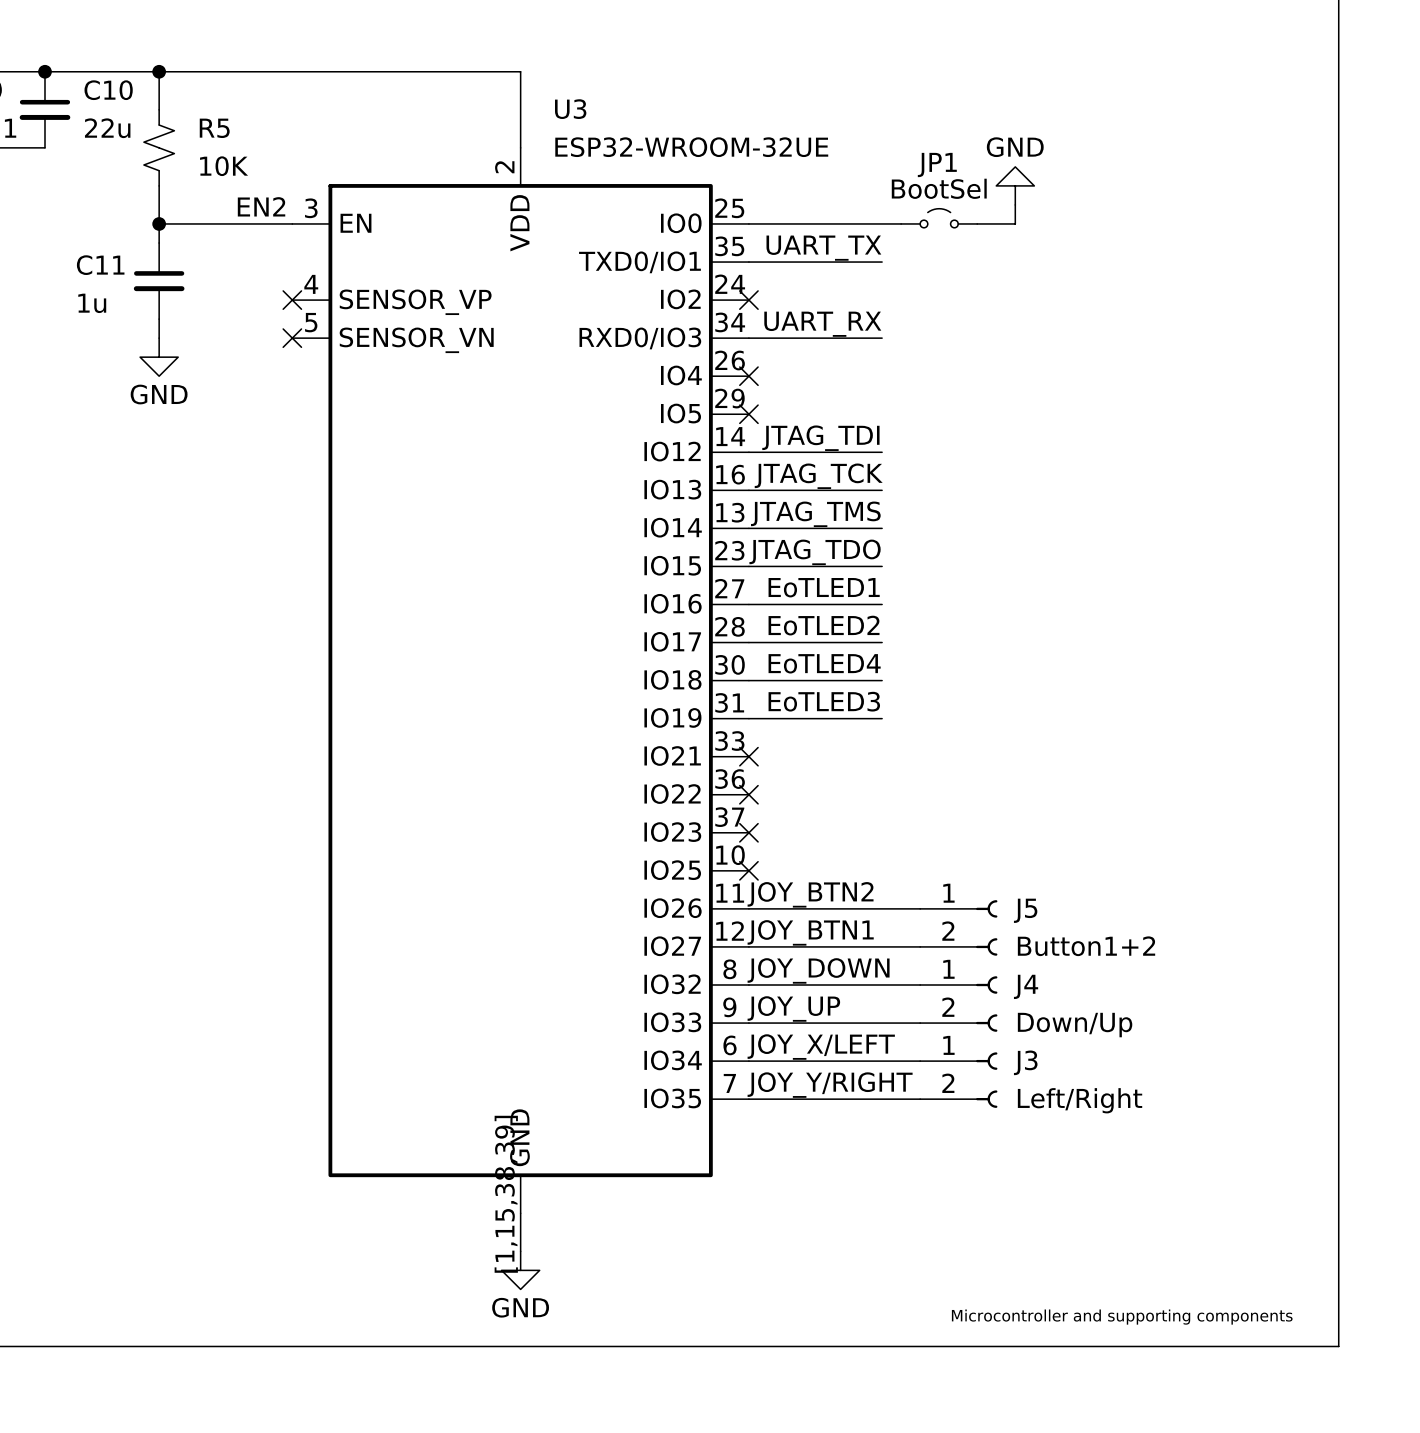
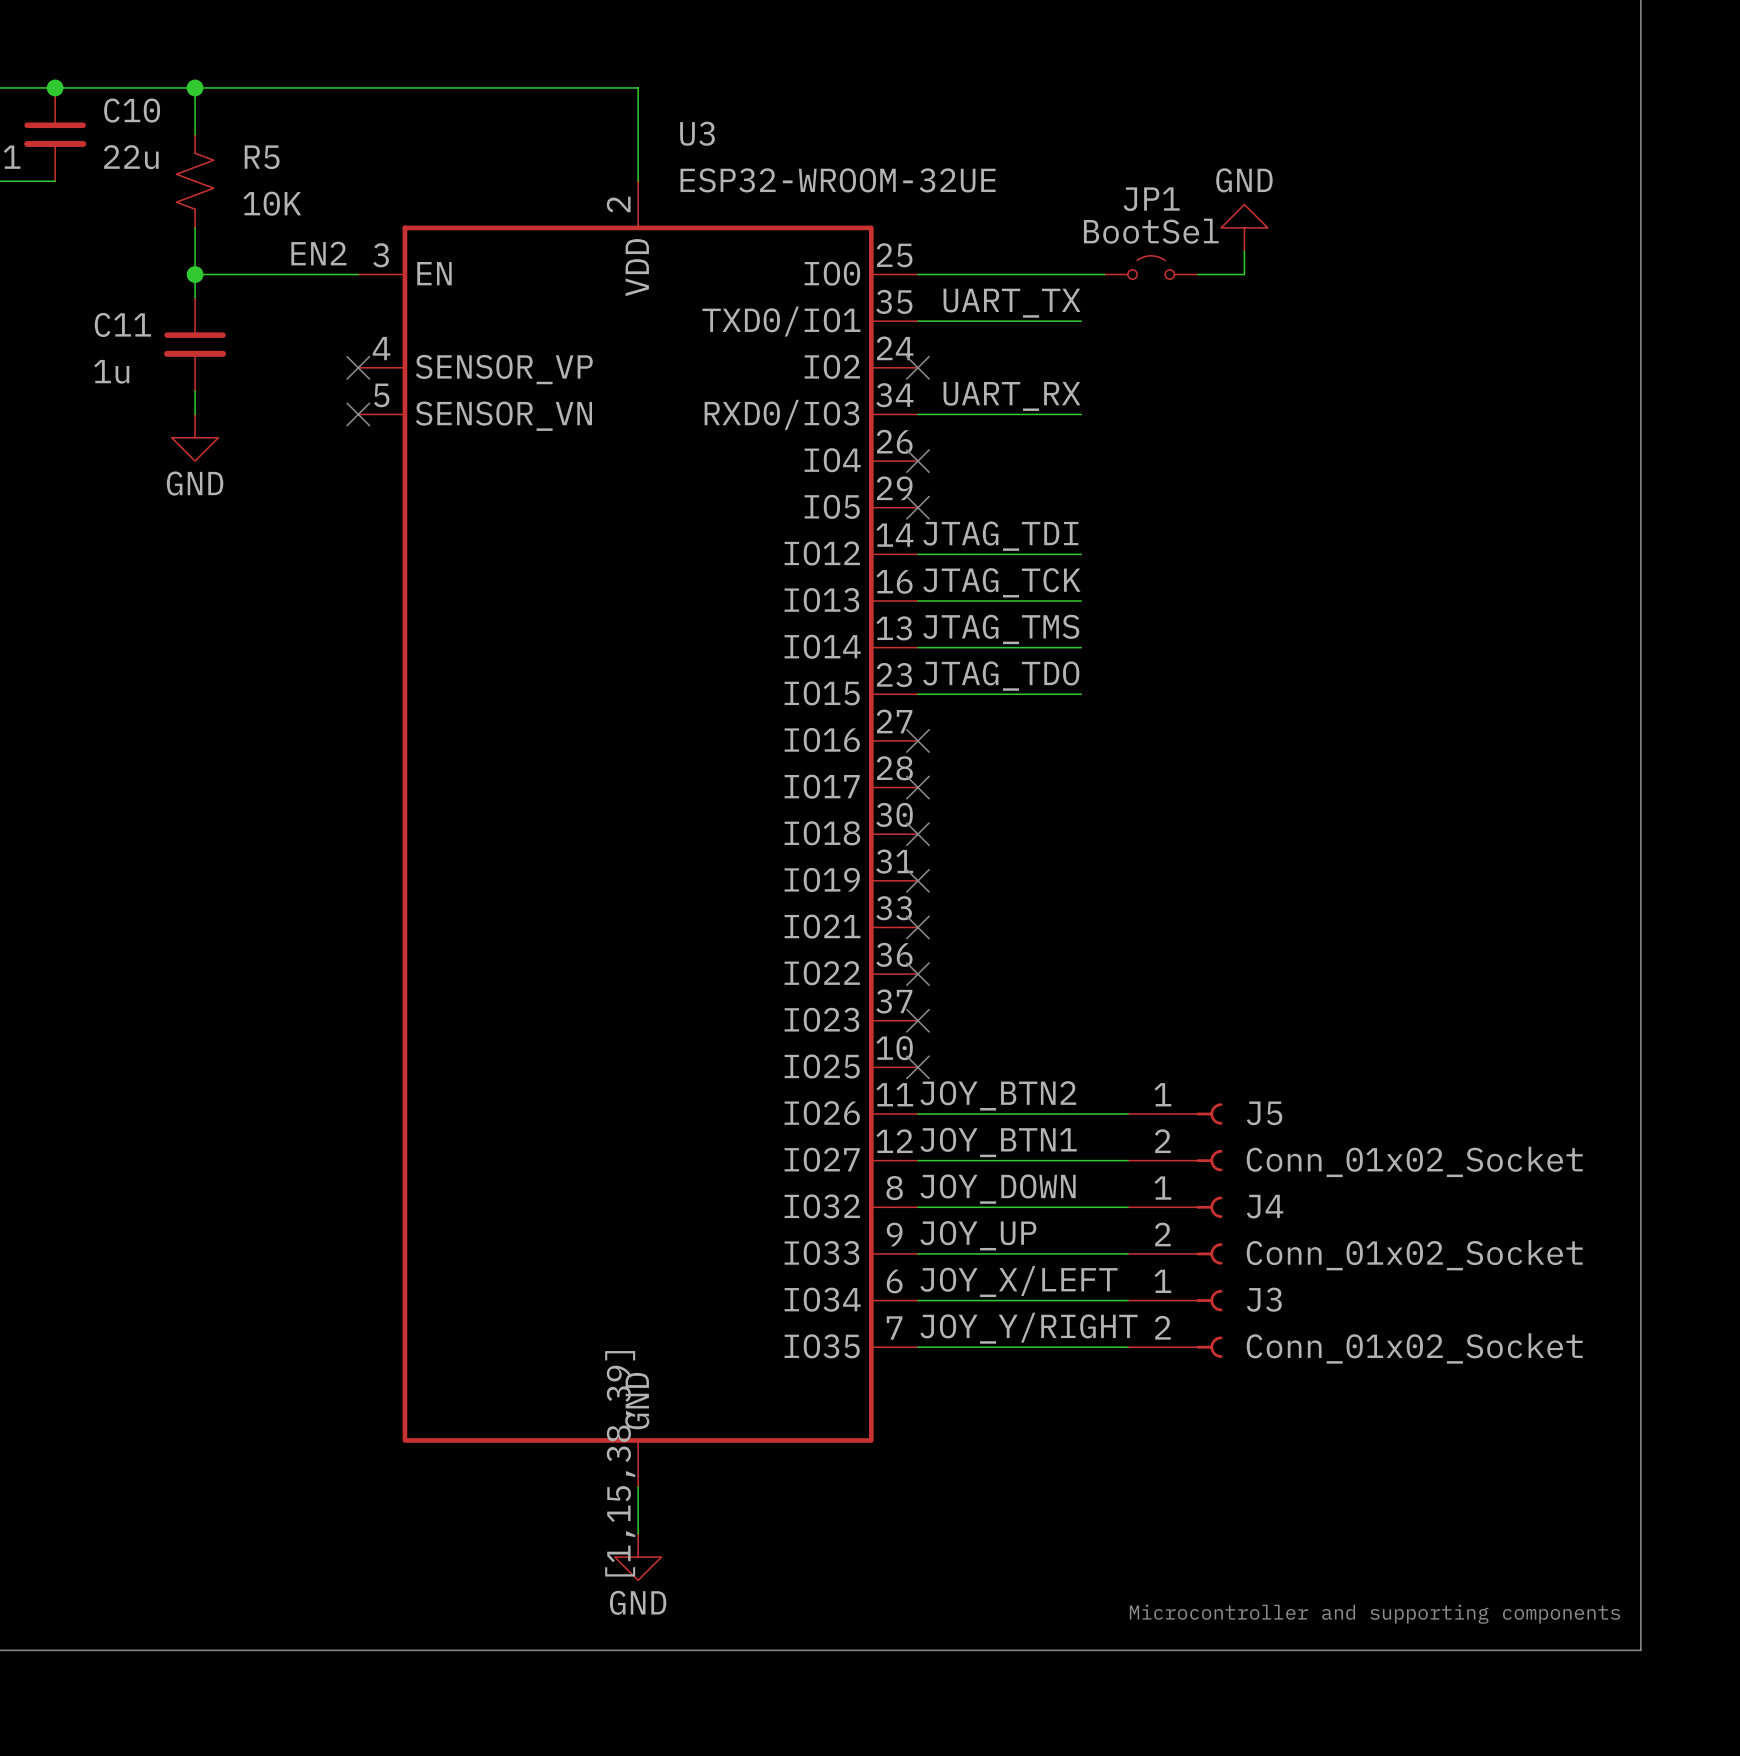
label: EoTLED1 (824, 587) -> none
wire: (748, 604) (882, 604) -> none
no-connect mark: none -> (917, 740)
label: EoTLED2 (824, 625) -> none
wire: (748, 642) (882, 642) -> none
no-connect mark: none -> (917, 787)
label: EoTLED4 (824, 663) -> none
wire: (748, 680) (882, 680) -> none
no-connect mark: none -> (917, 834)
label: EoTLED3 (824, 701) -> none
wire: (748, 718) (882, 718) -> none
no-connect mark: none -> (917, 880)
J5 value: Button1+2 (1086, 946) -> Conn_01x02_Socket (1414, 1161)
J4 value: Down/Up (1075, 1025) -> Conn_01x02_Socket (1414, 1255)
J3 value: Left/Right (1080, 1100) -> Conn_01x02_Socket (1414, 1348)

